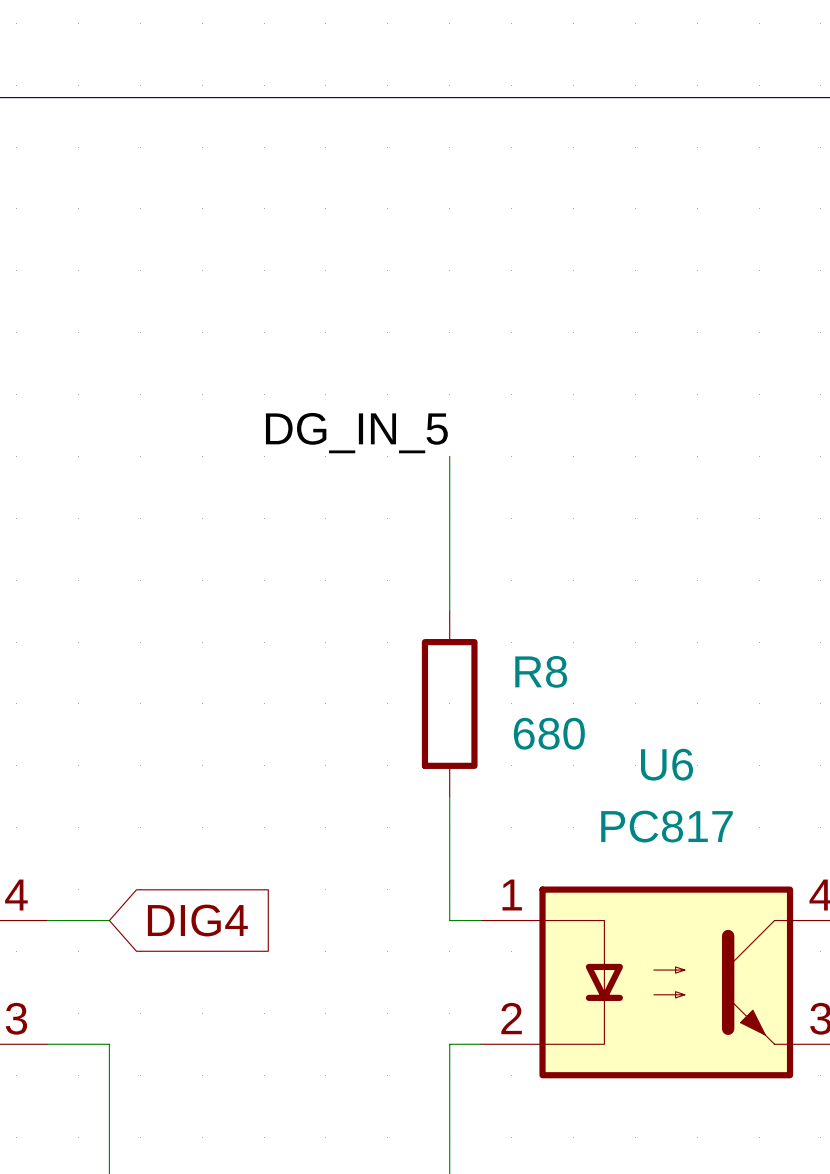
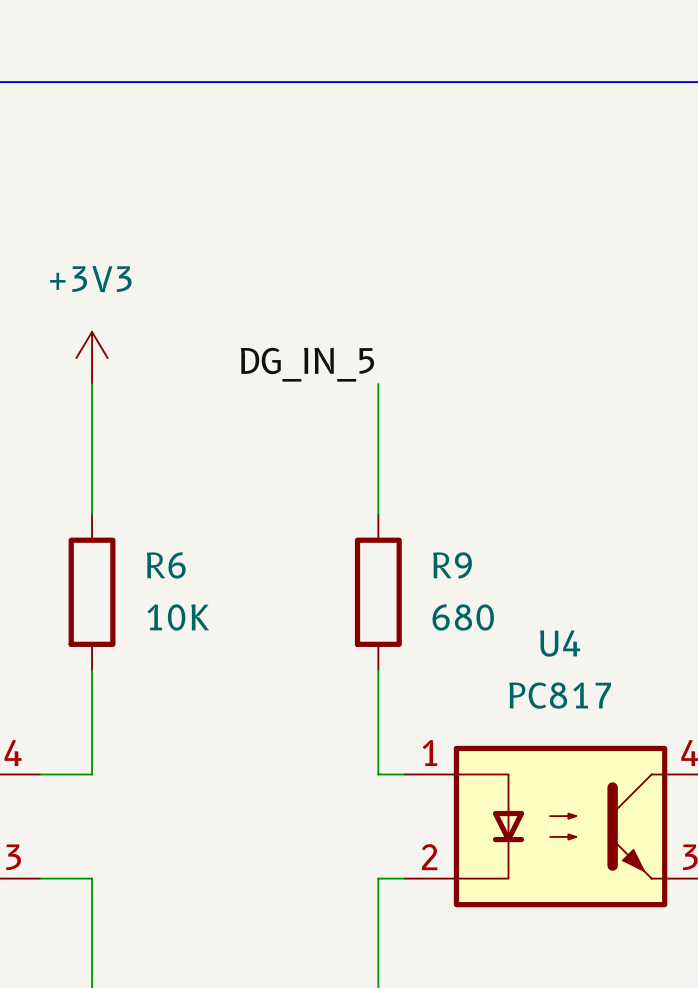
power symbol: none -> +3V3 (92, 358)
wire: none -> (92, 384) (92, 514)
R8 name: R8 (541, 671) -> R9 (452, 565)
R6: none -> 10K (92, 592)
U6 name: U6 (667, 764) -> U4 (560, 643)
wire: none -> (92, 670) (92, 774)
global label: DIG4 (197, 920) -> none

